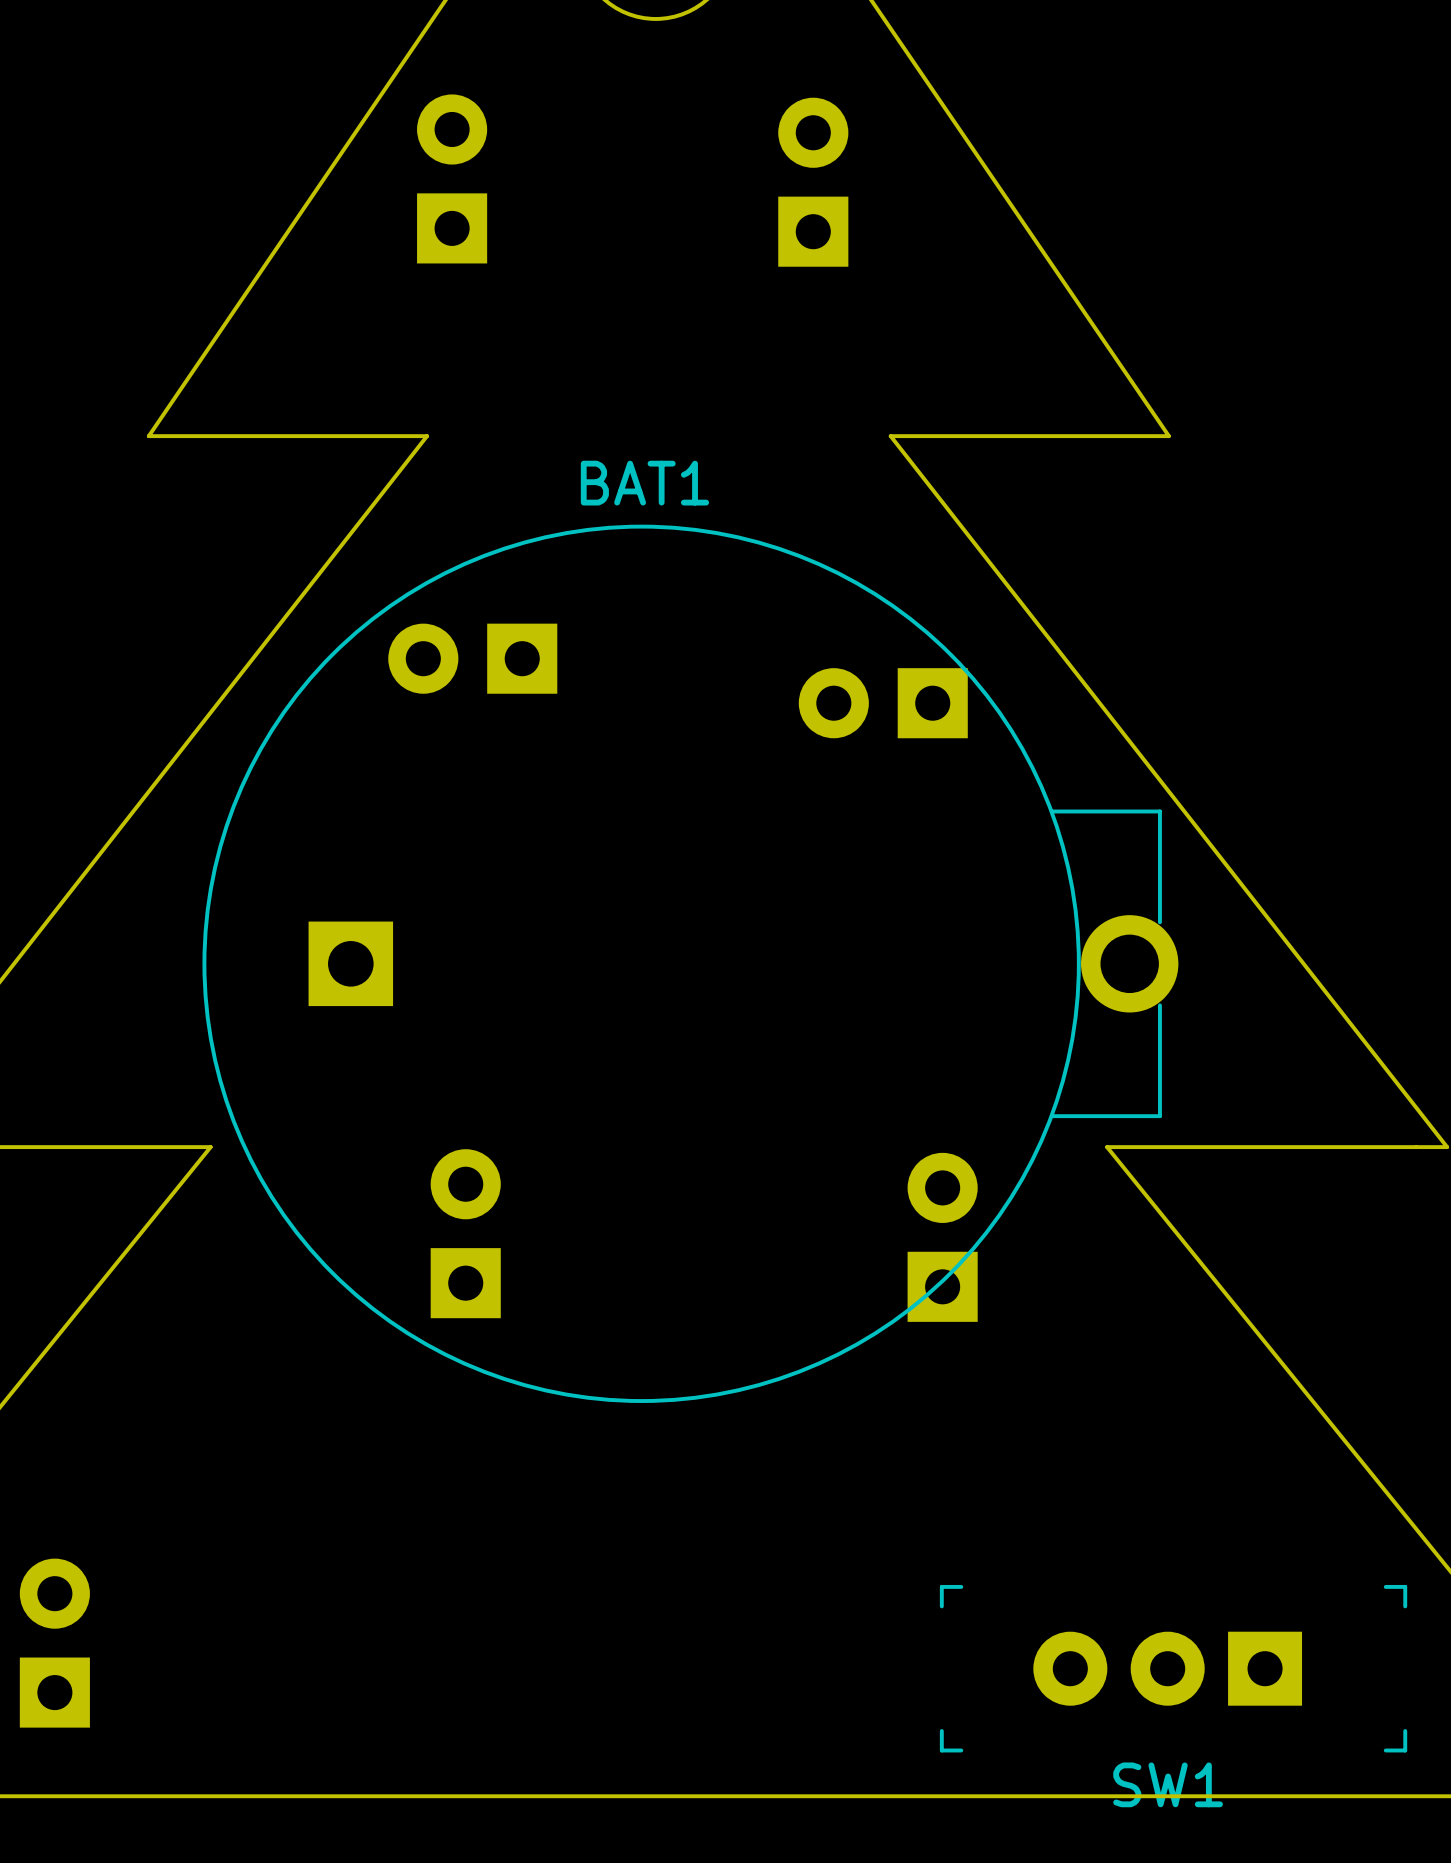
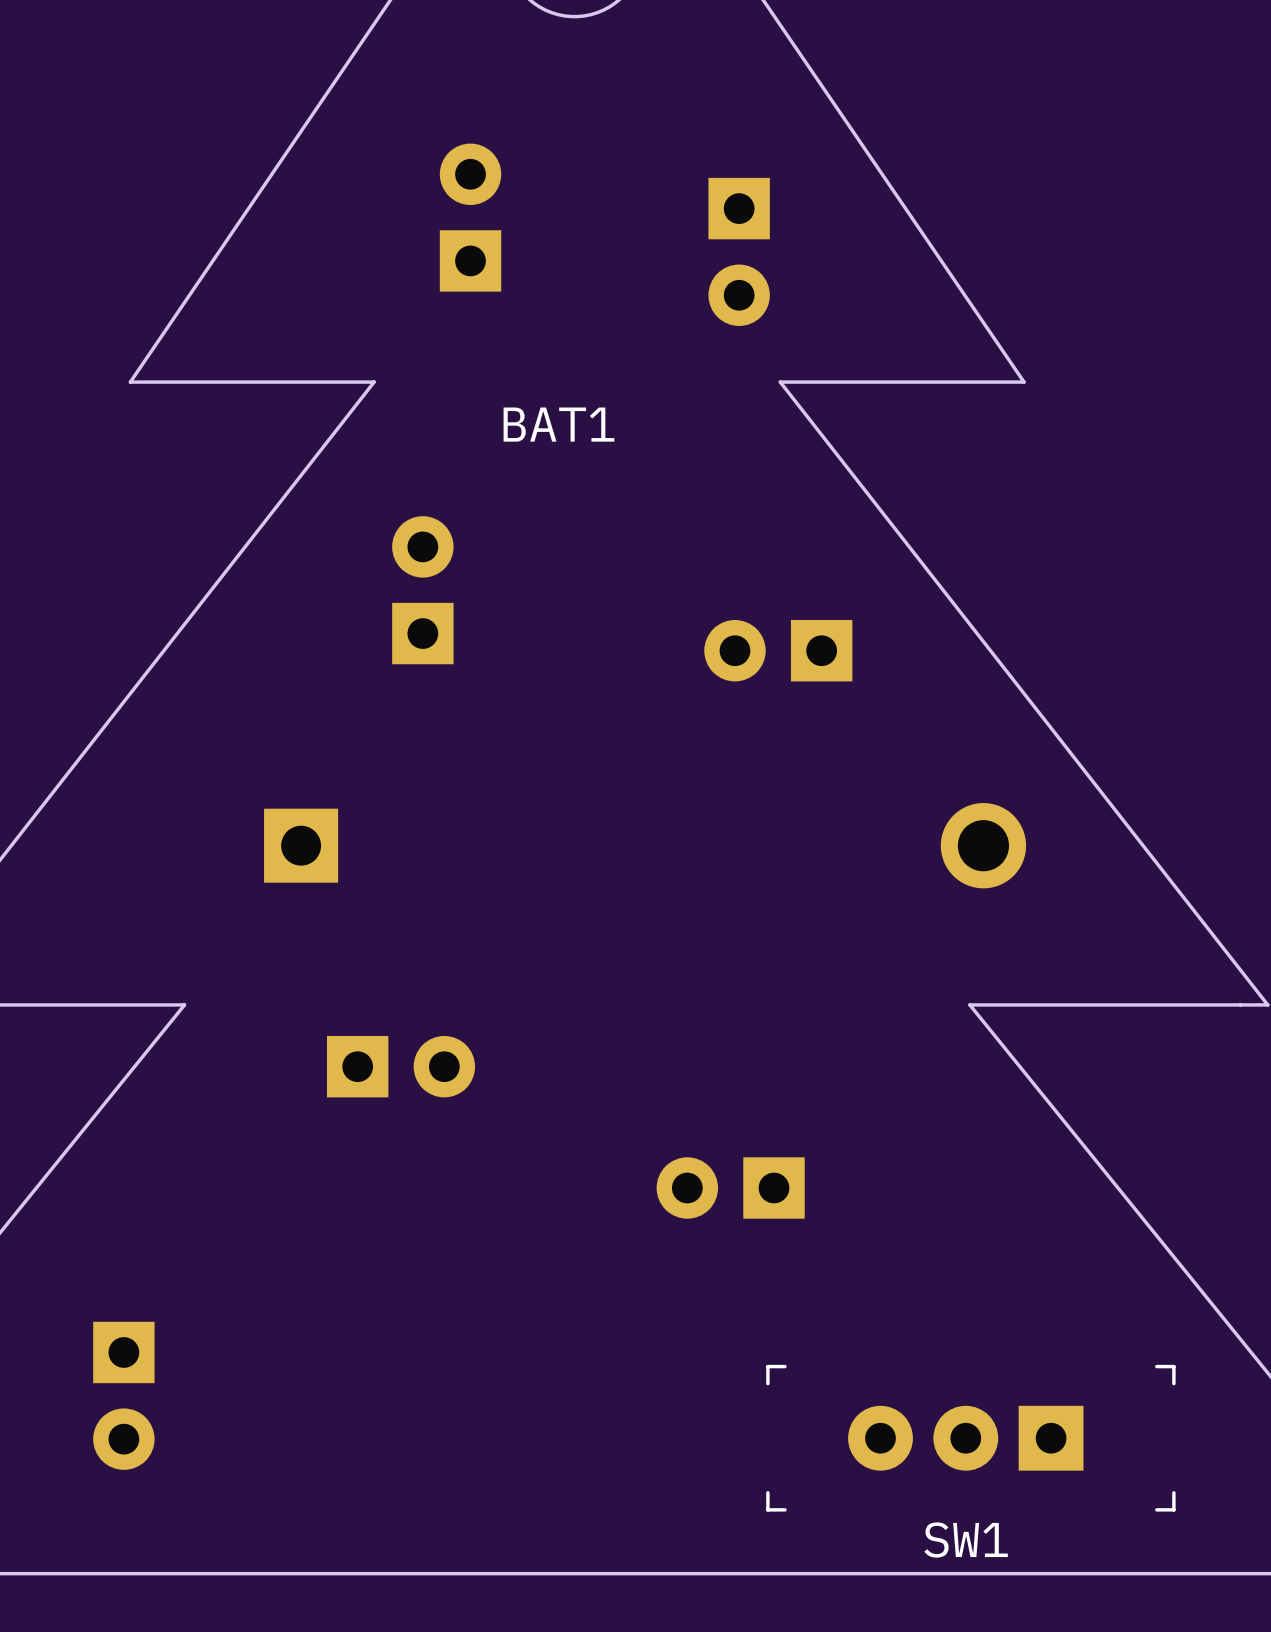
part position: (452, 178) -> (470, 217)
part rotation: 0° (813, 182) -> 180° (739, 251)
part position: (813, 182) -> (739, 251)
BAT1 footprint: [202, 524, 1179, 1403] -> [264, 803, 1027, 889]
part rotation: 0° (472, 658) -> 90° clockwise (422, 590)
part position: (883, 703) -> (778, 650)
part rotation: 0° (465, 1233) -> 90° clockwise (401, 1066)
part rotation: 0° (942, 1237) -> 90° counterclockwise (730, 1188)
part position: (942, 1237) -> (730, 1188)
part rotation: 0° (54, 1643) -> 180° (123, 1395)
SW1 position: (1173, 1668) -> (970, 1438)

